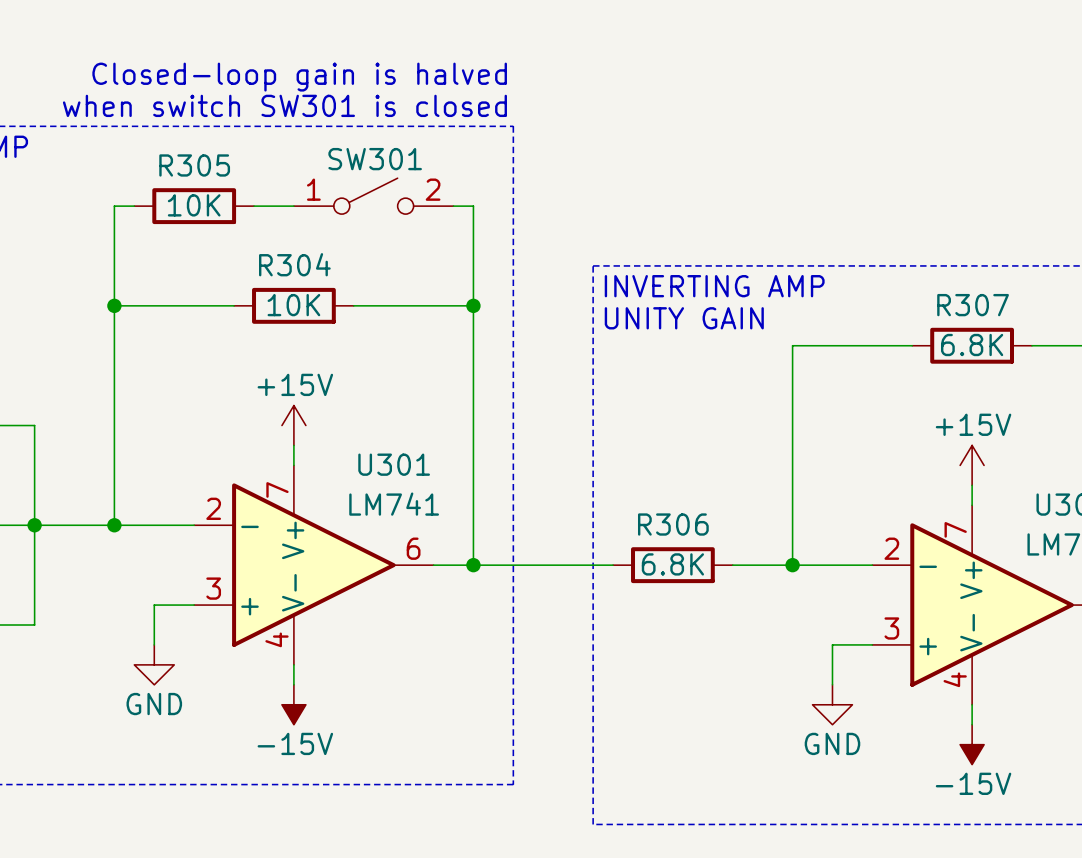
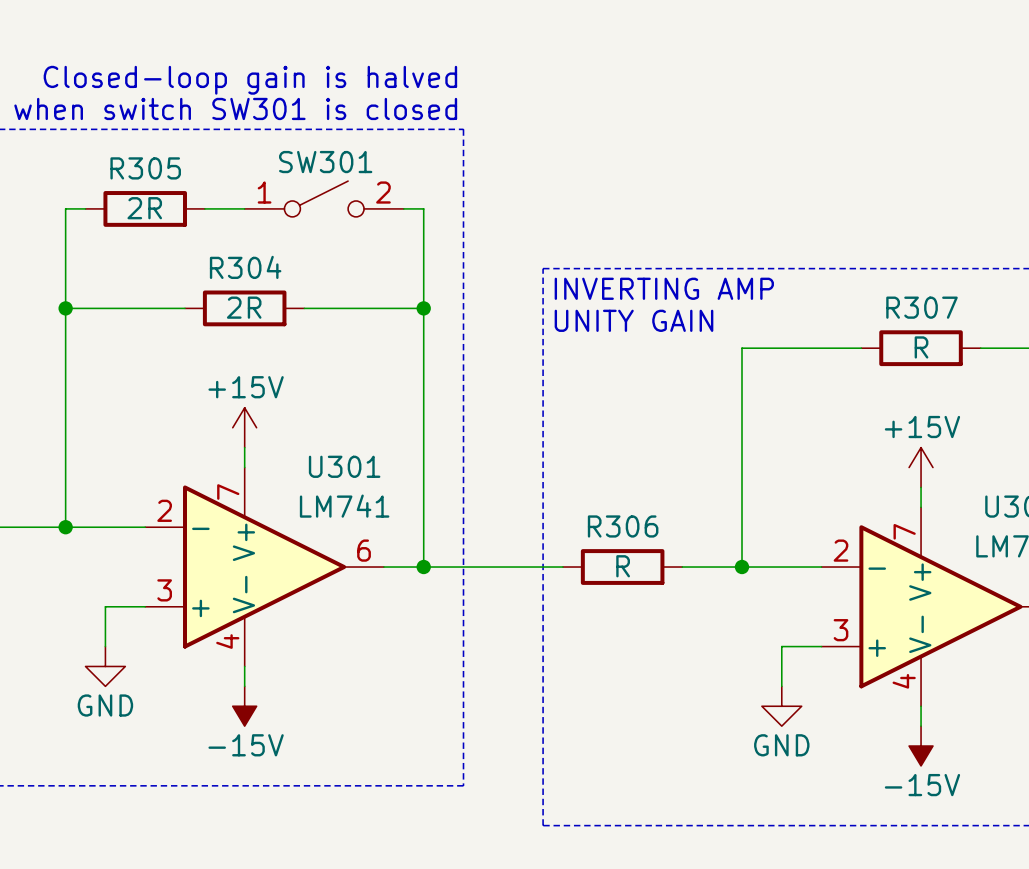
R305 value: 10K (194, 205) -> 2R (144, 208)
R304 value: 10K (293, 305) -> 2R (244, 307)
R307 value: 6.8K (972, 345) -> R (921, 347)
R306 value: 6.8K (672, 564) -> R (623, 566)

